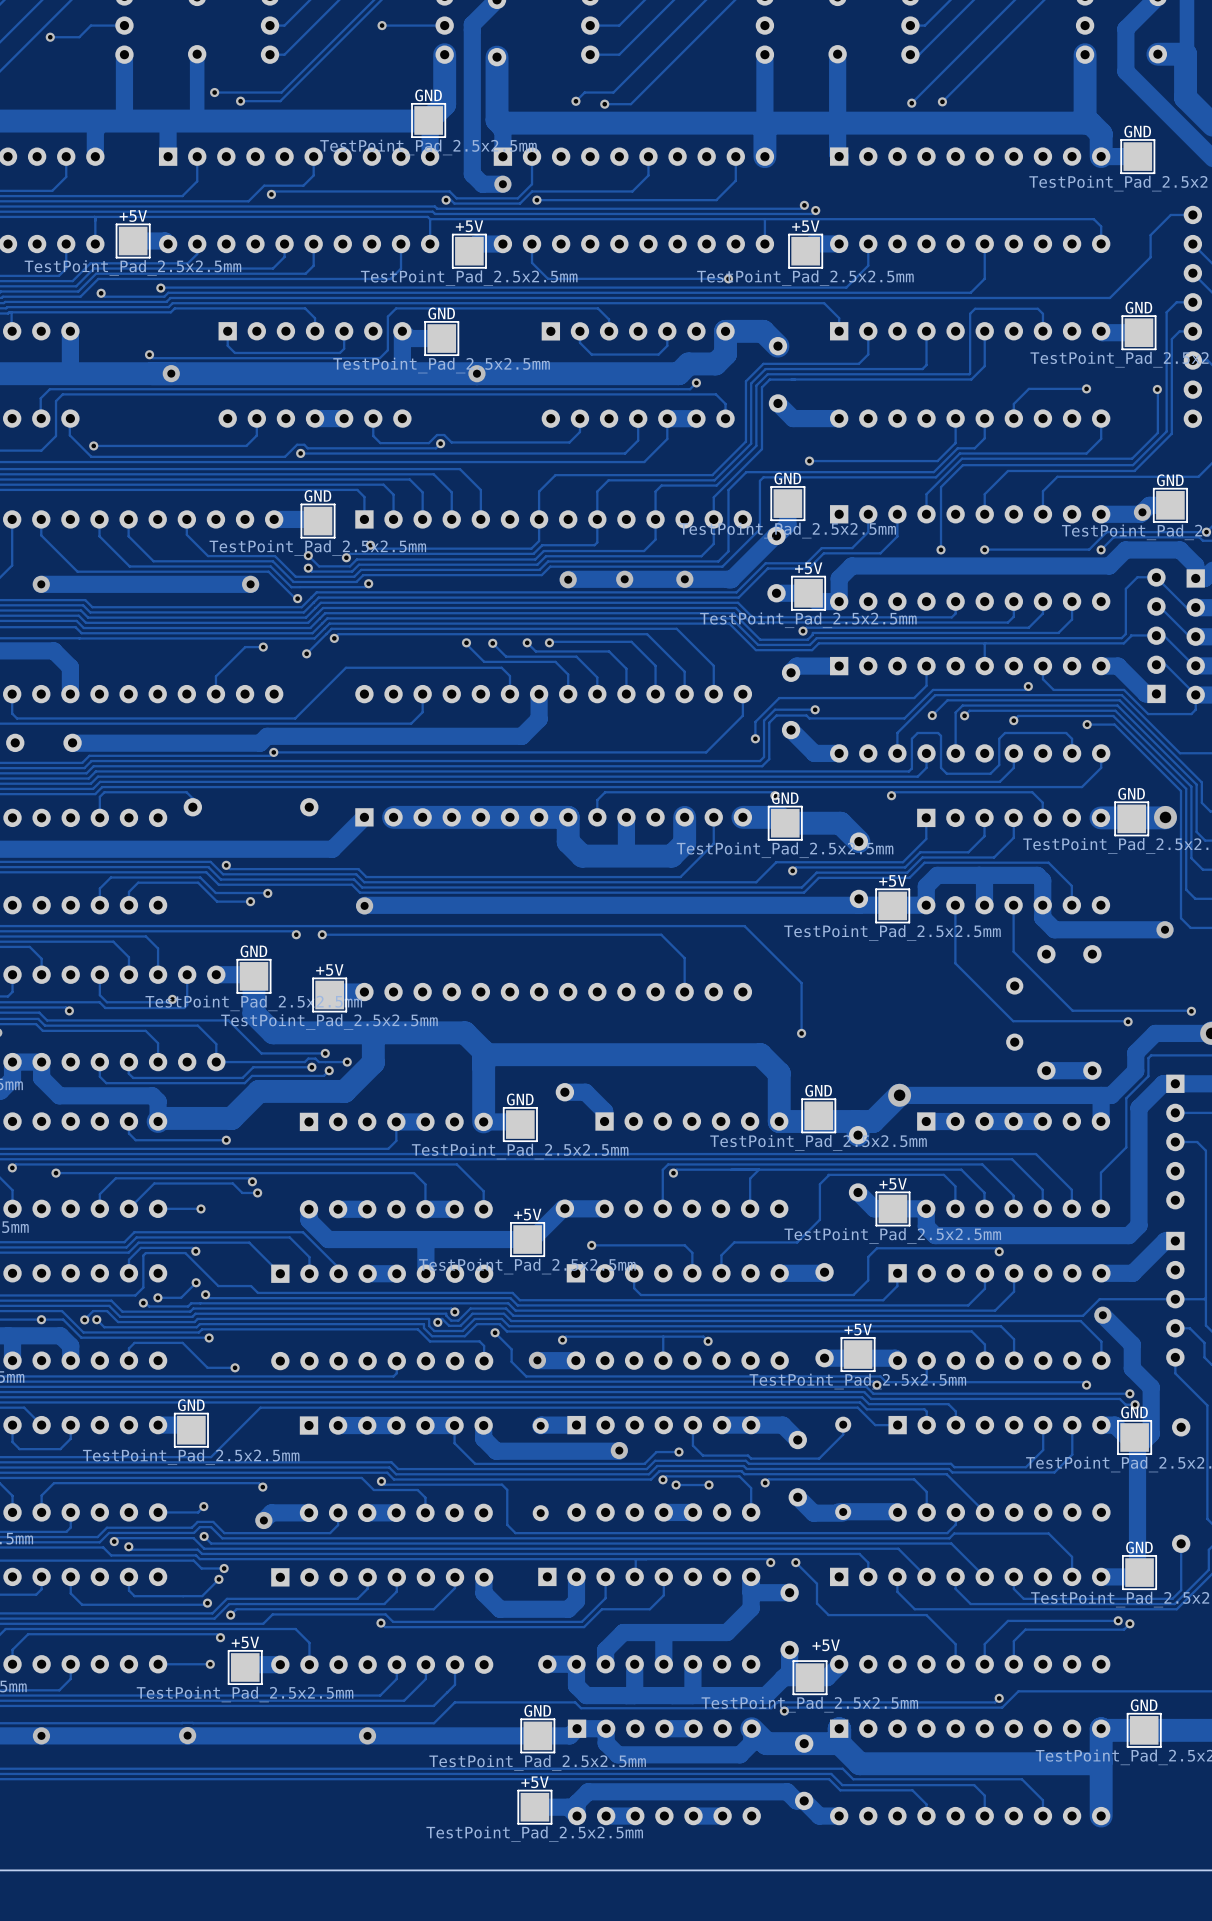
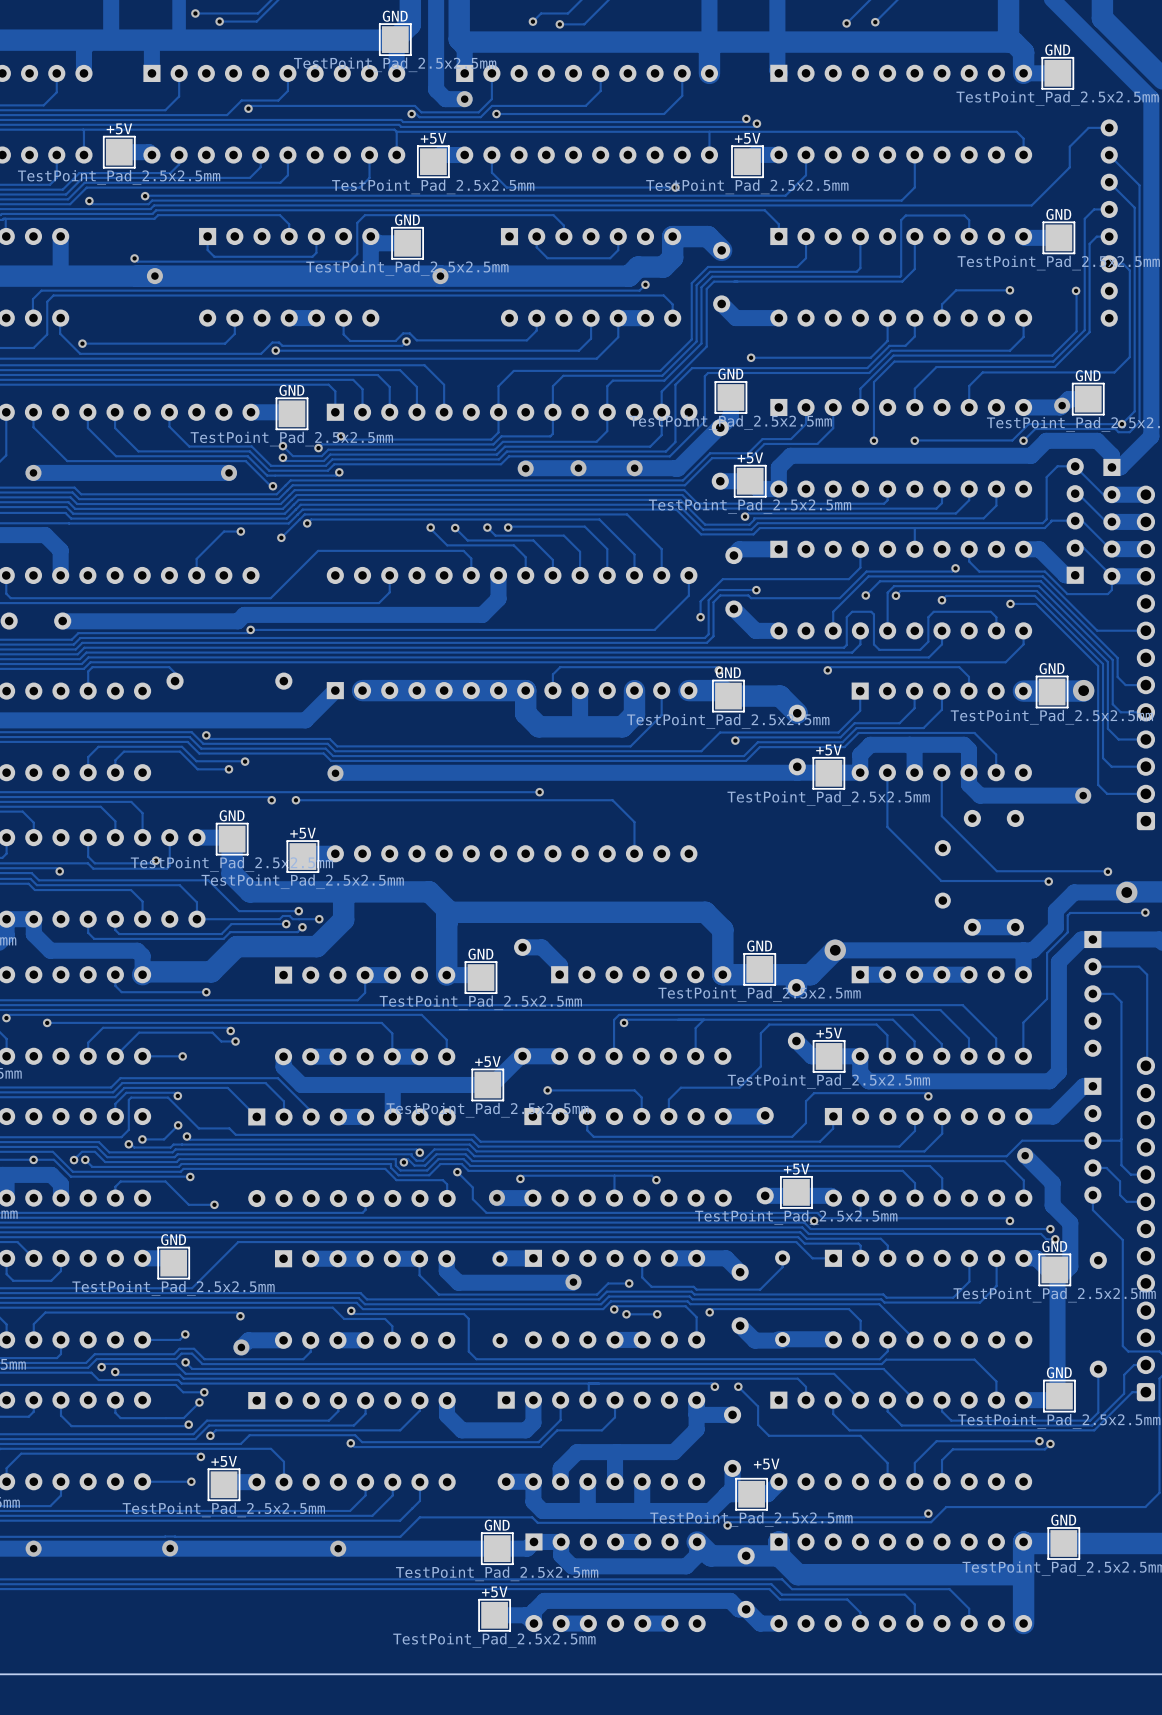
track: (583, 926) (744, 926) (801, 983) (801, 1033) -> none
via: none -> (539, 792)
via: (801, 1033) -> none

